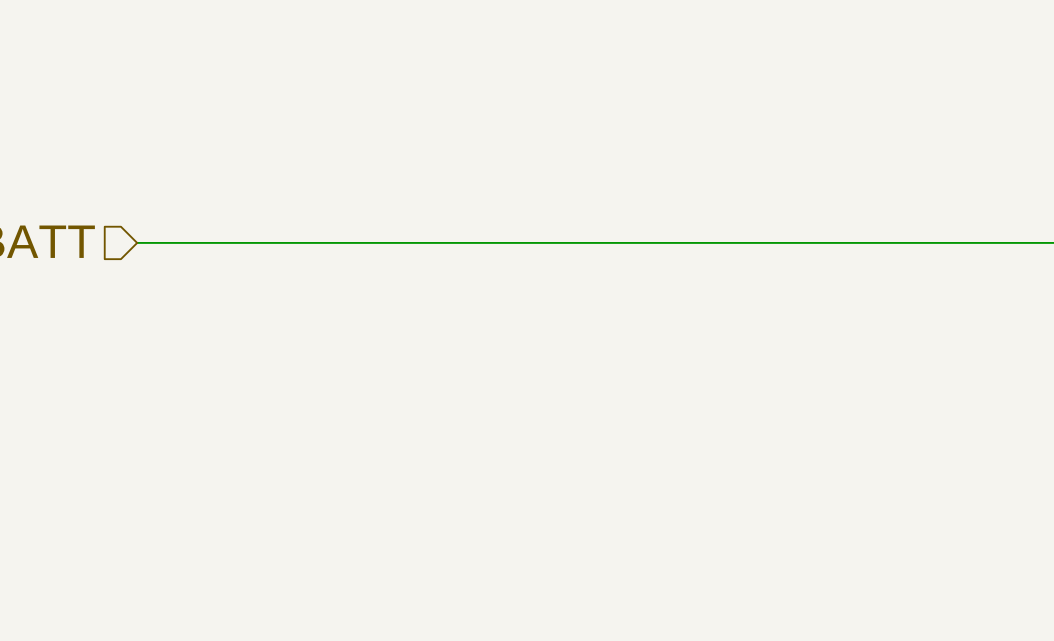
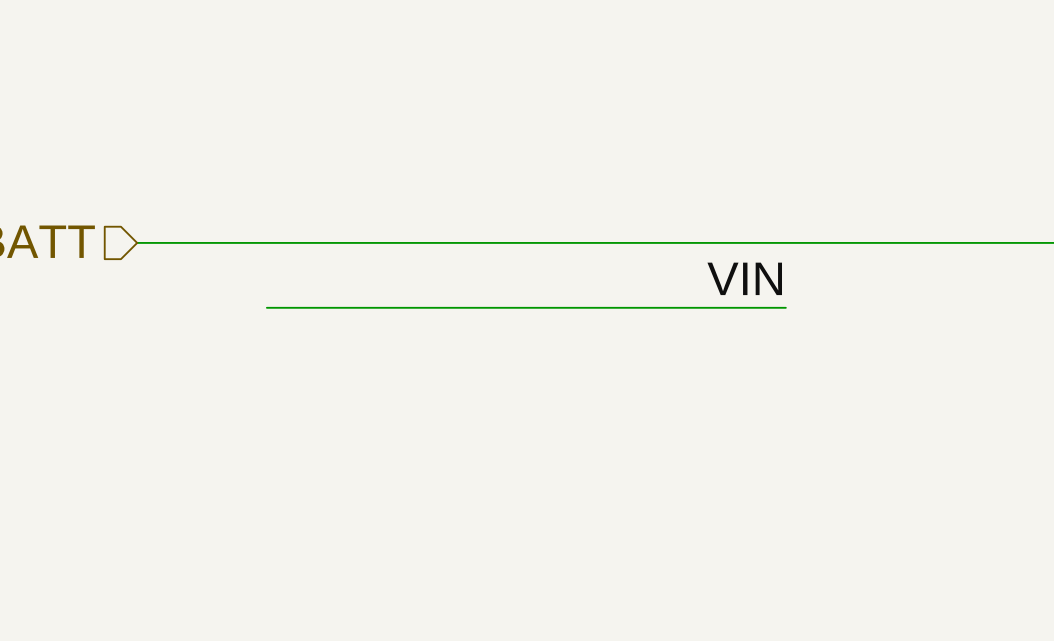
label: none -> VIN (744, 278)
wire: none -> (266, 307) (785, 307)

